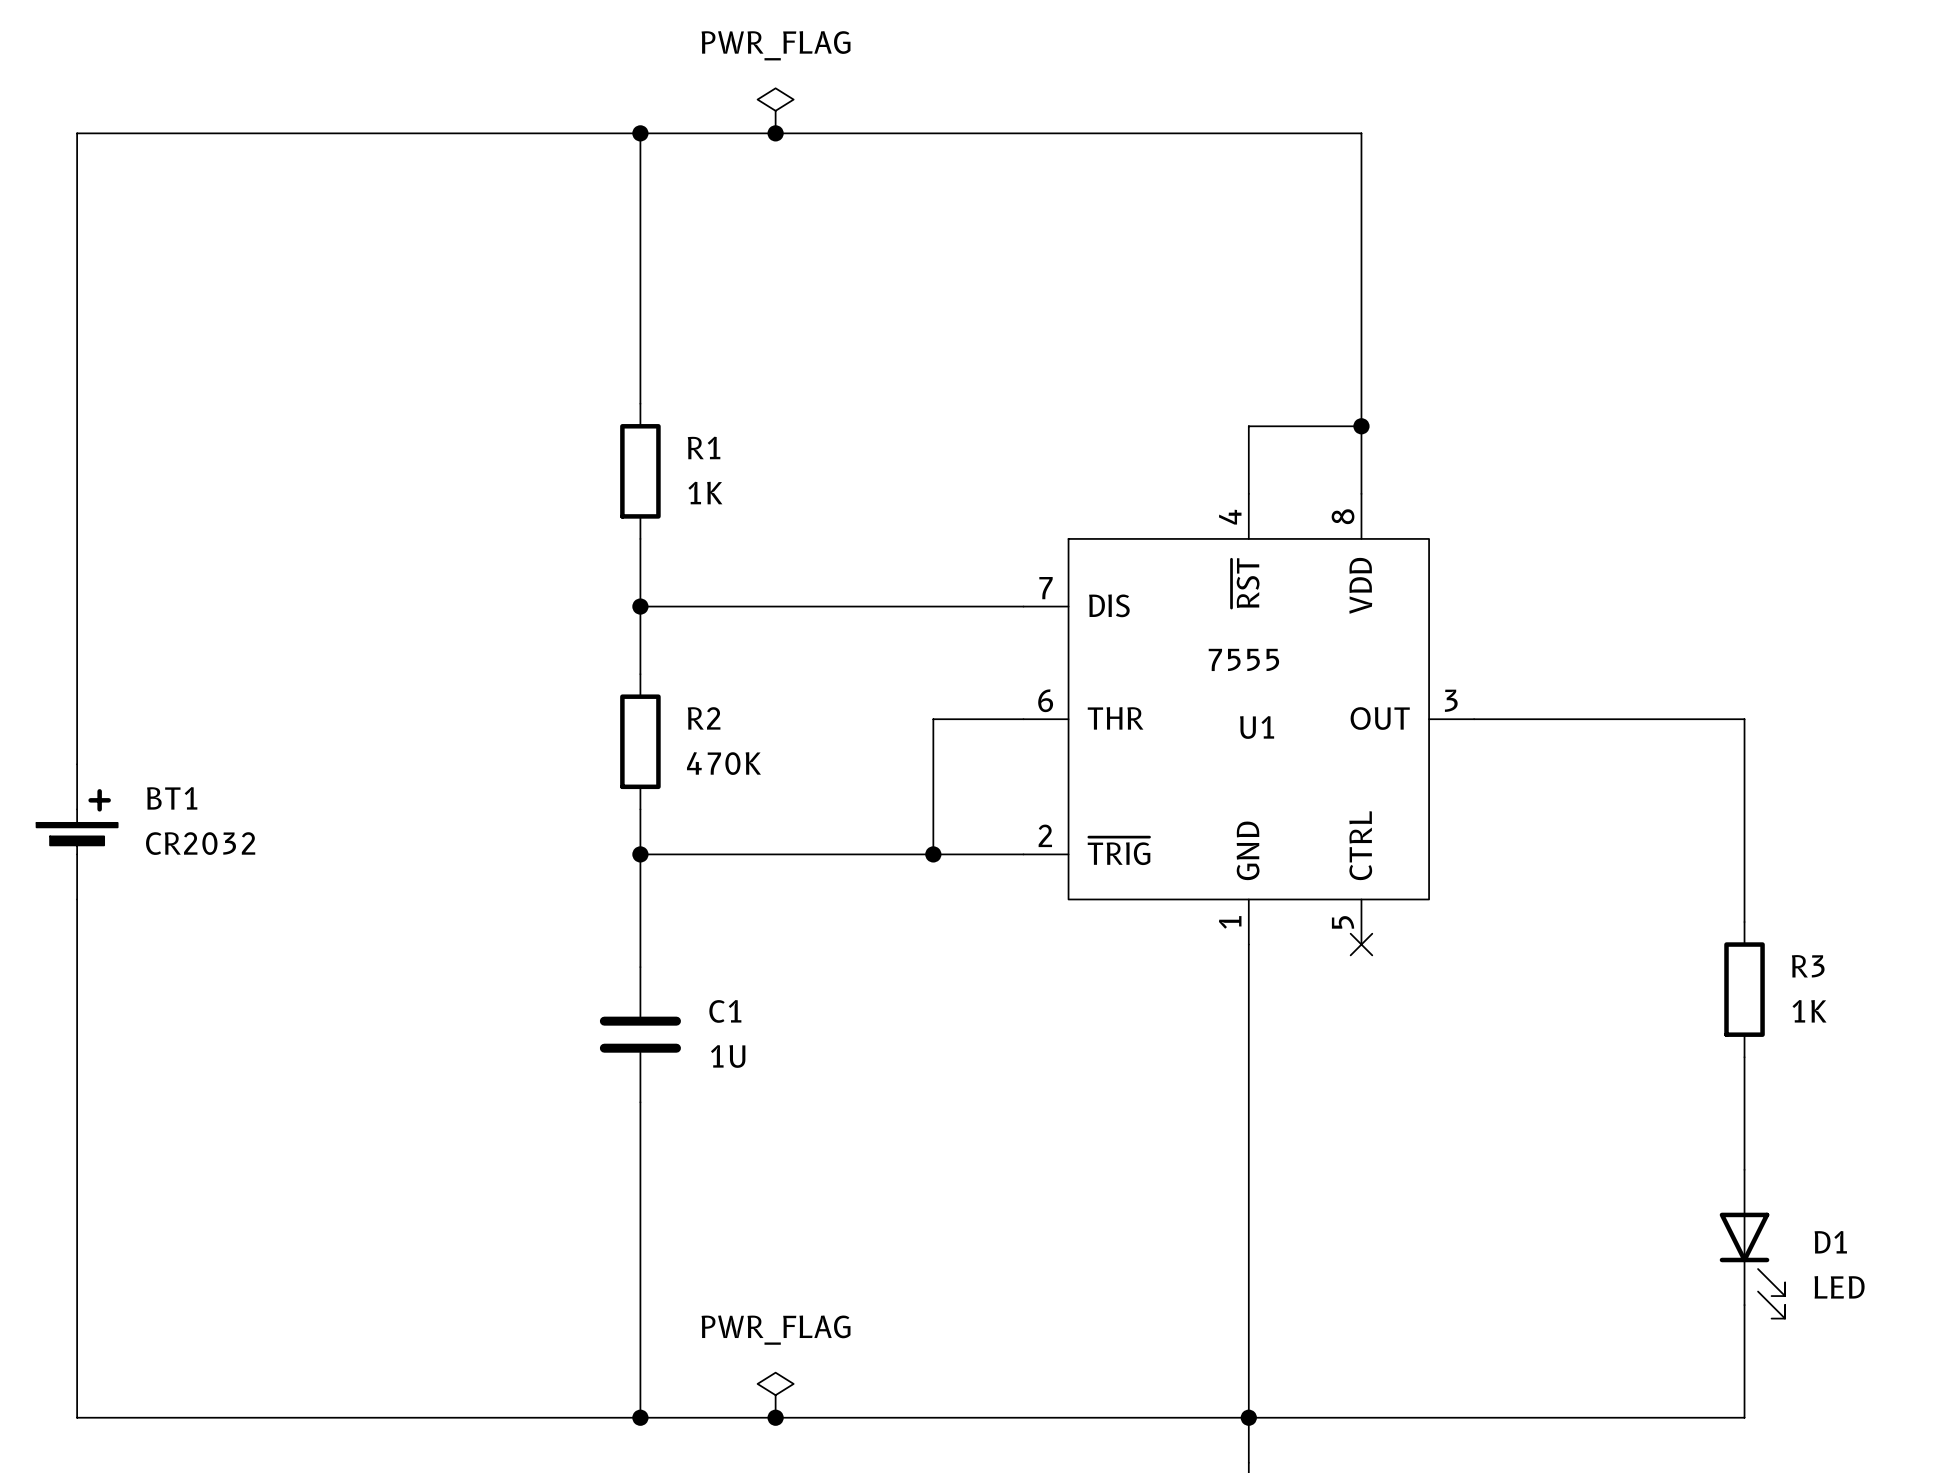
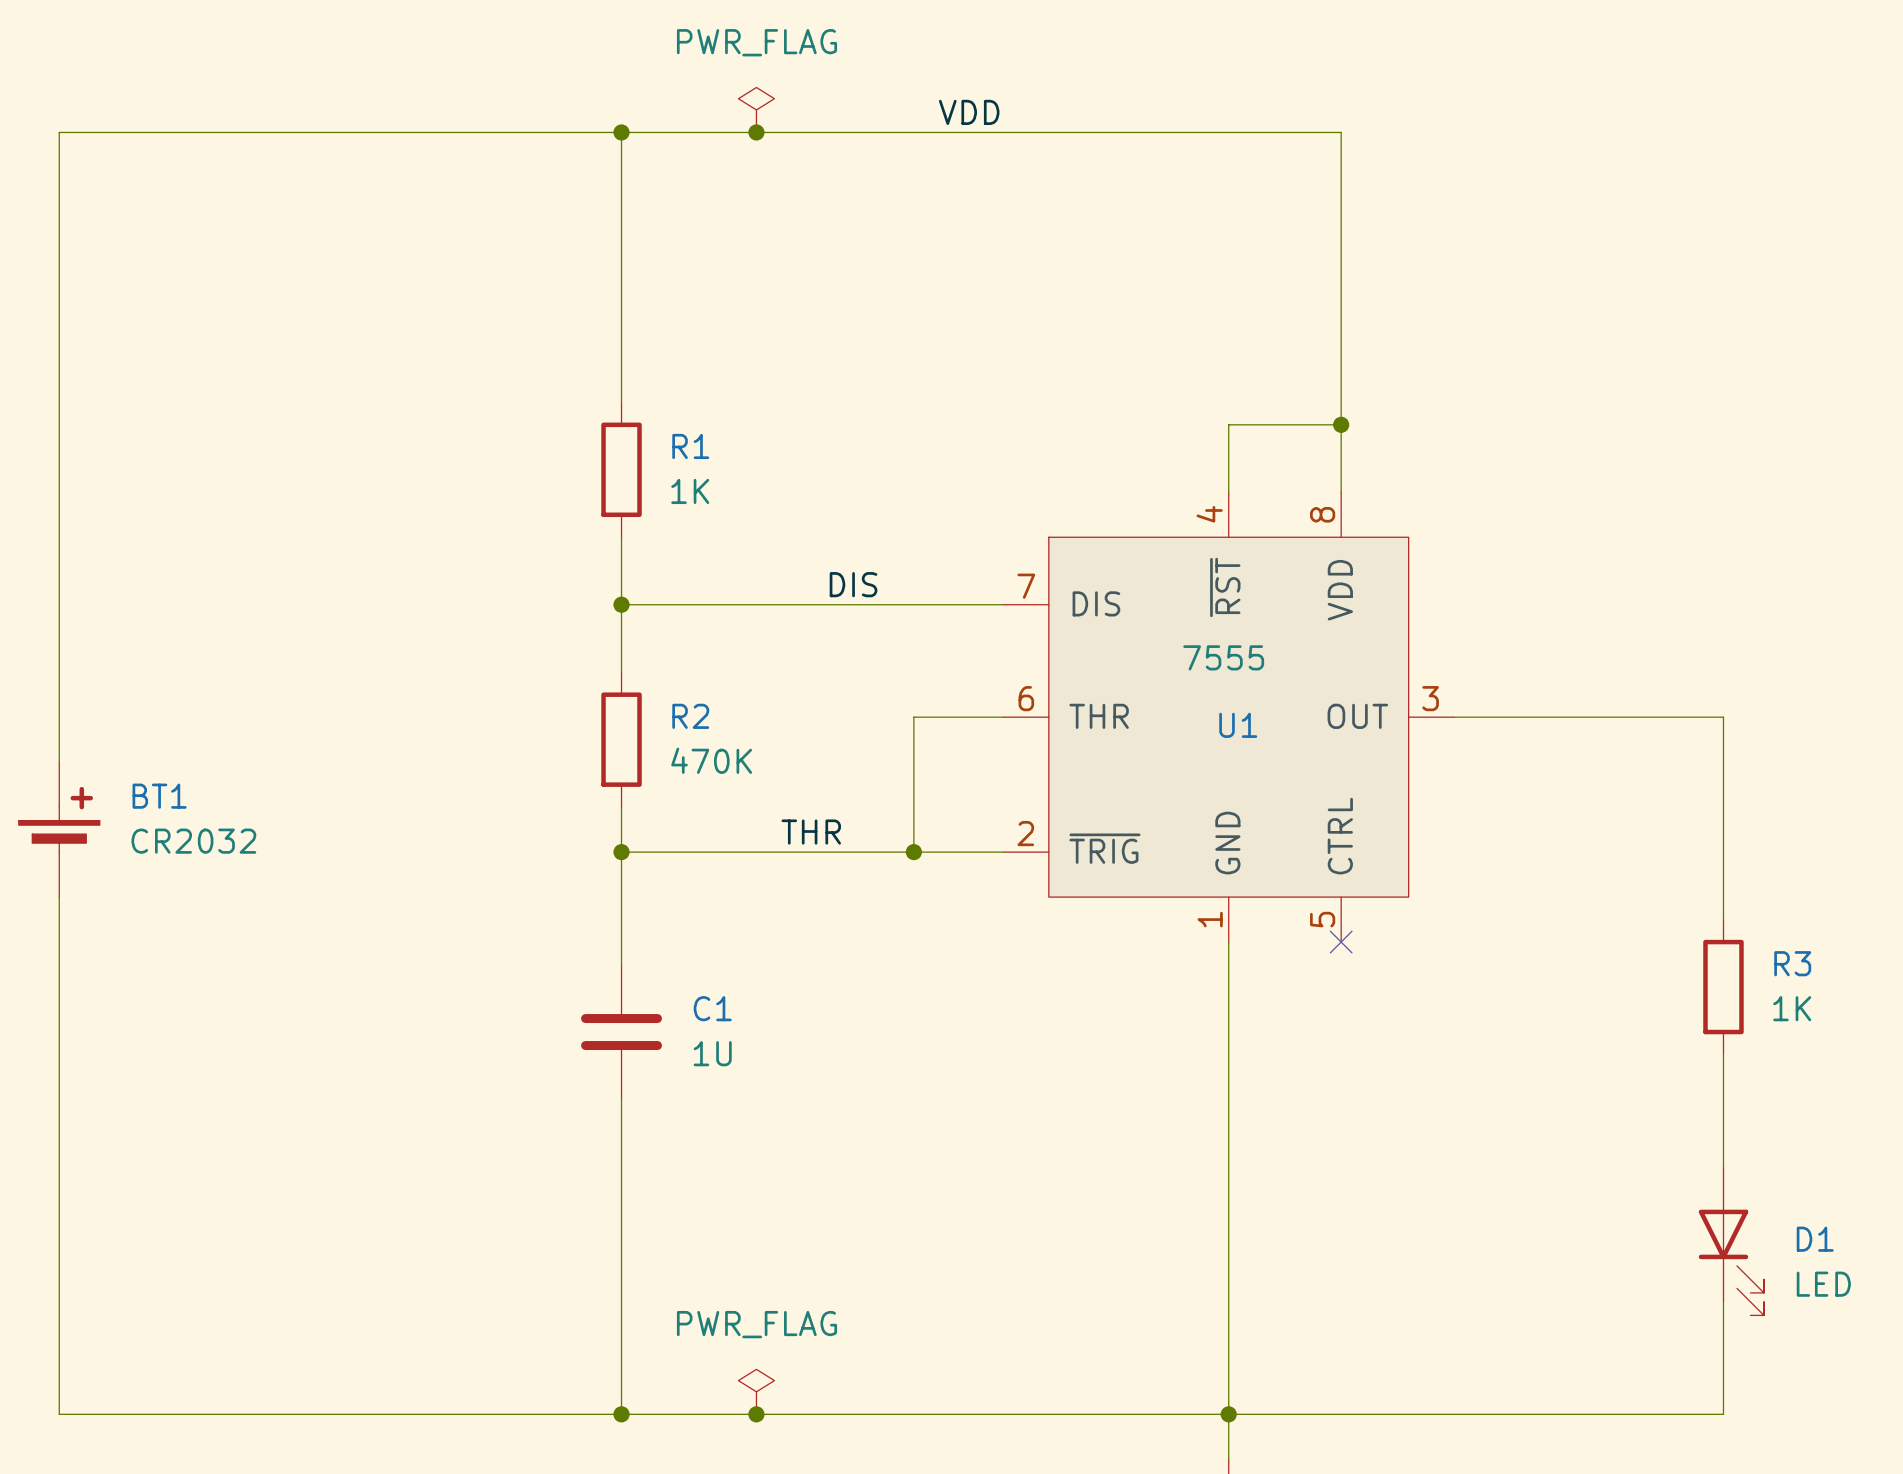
label: none -> VDD (969, 112)
label: none -> DIS (853, 584)
label: none -> THR (811, 832)

